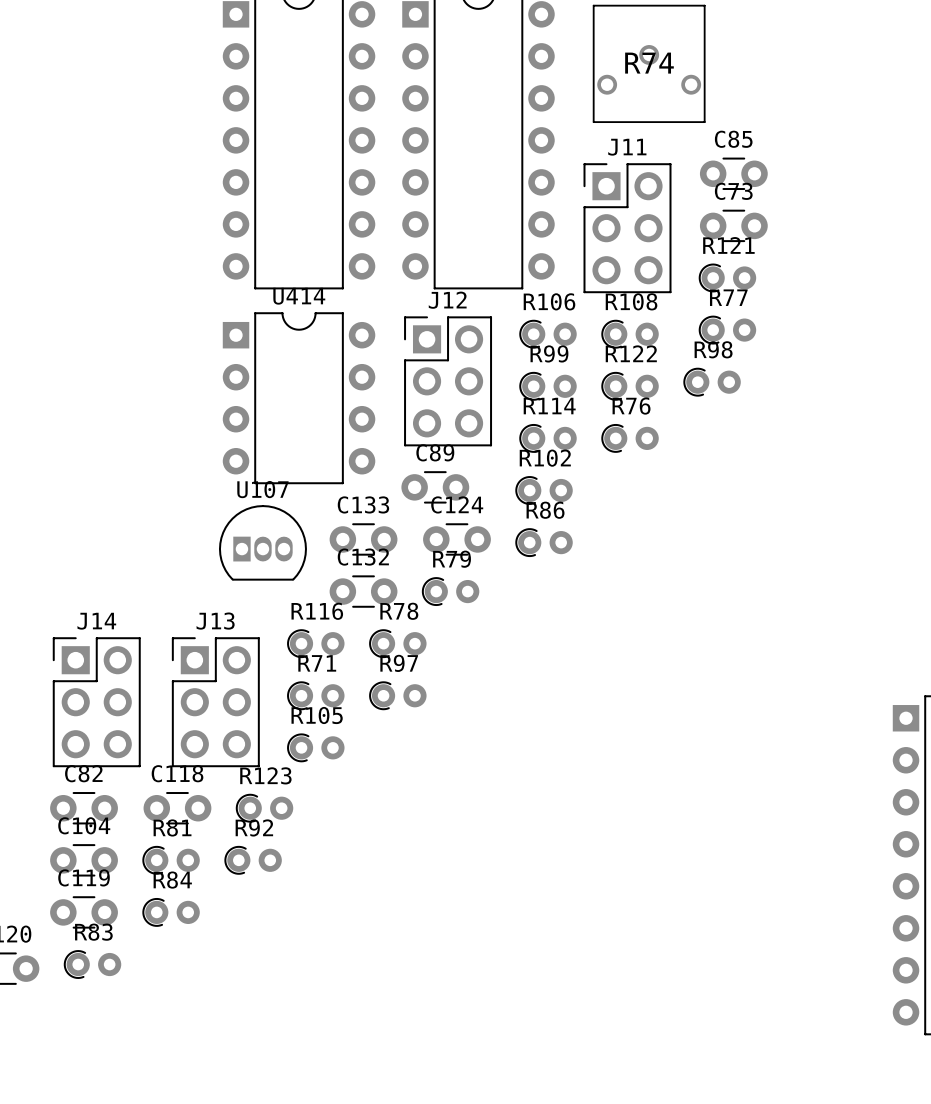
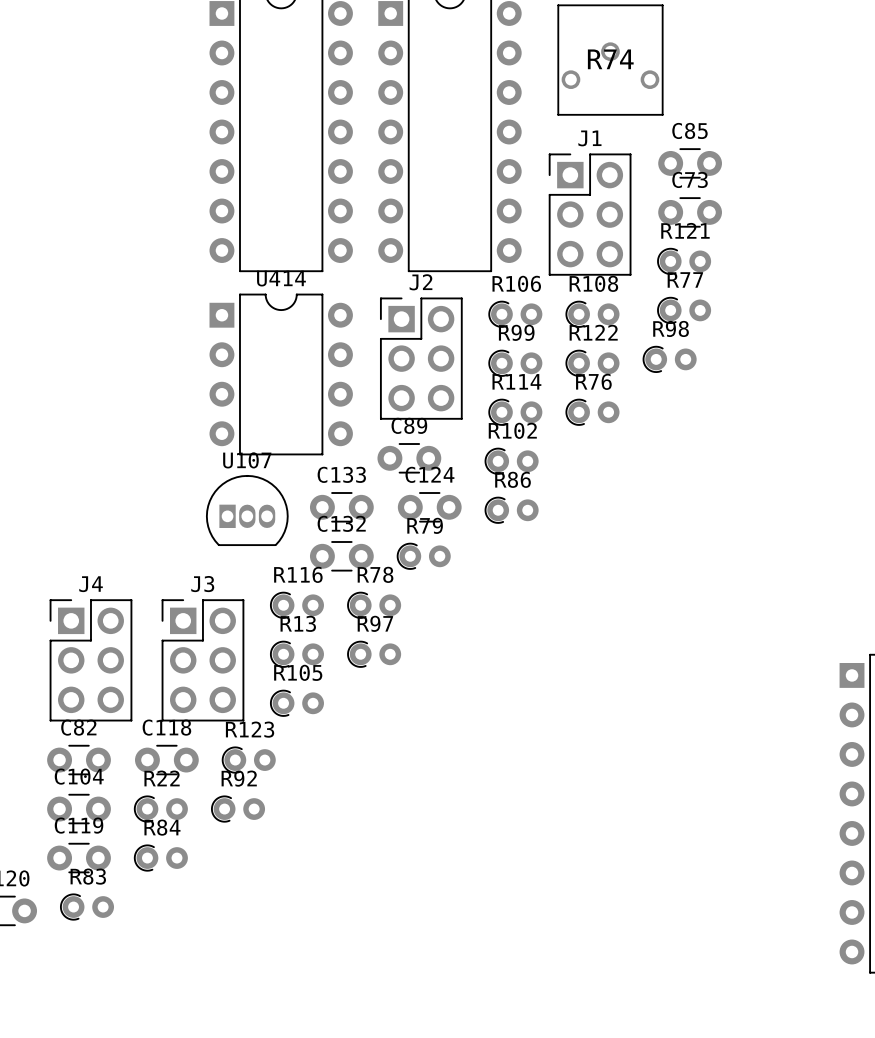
J11 name: J11 (627, 147) -> J1 (589, 138)
J12 name: J12 (447, 300) -> J2 (421, 282)
J14 name: J14 (96, 621) -> J4 (91, 584)
J13 name: J13 (215, 621) -> J3 (202, 584)
R71 name: R71 (317, 663) -> R13 (298, 623)
R81 name: R81 (172, 827) -> R22 (162, 778)

